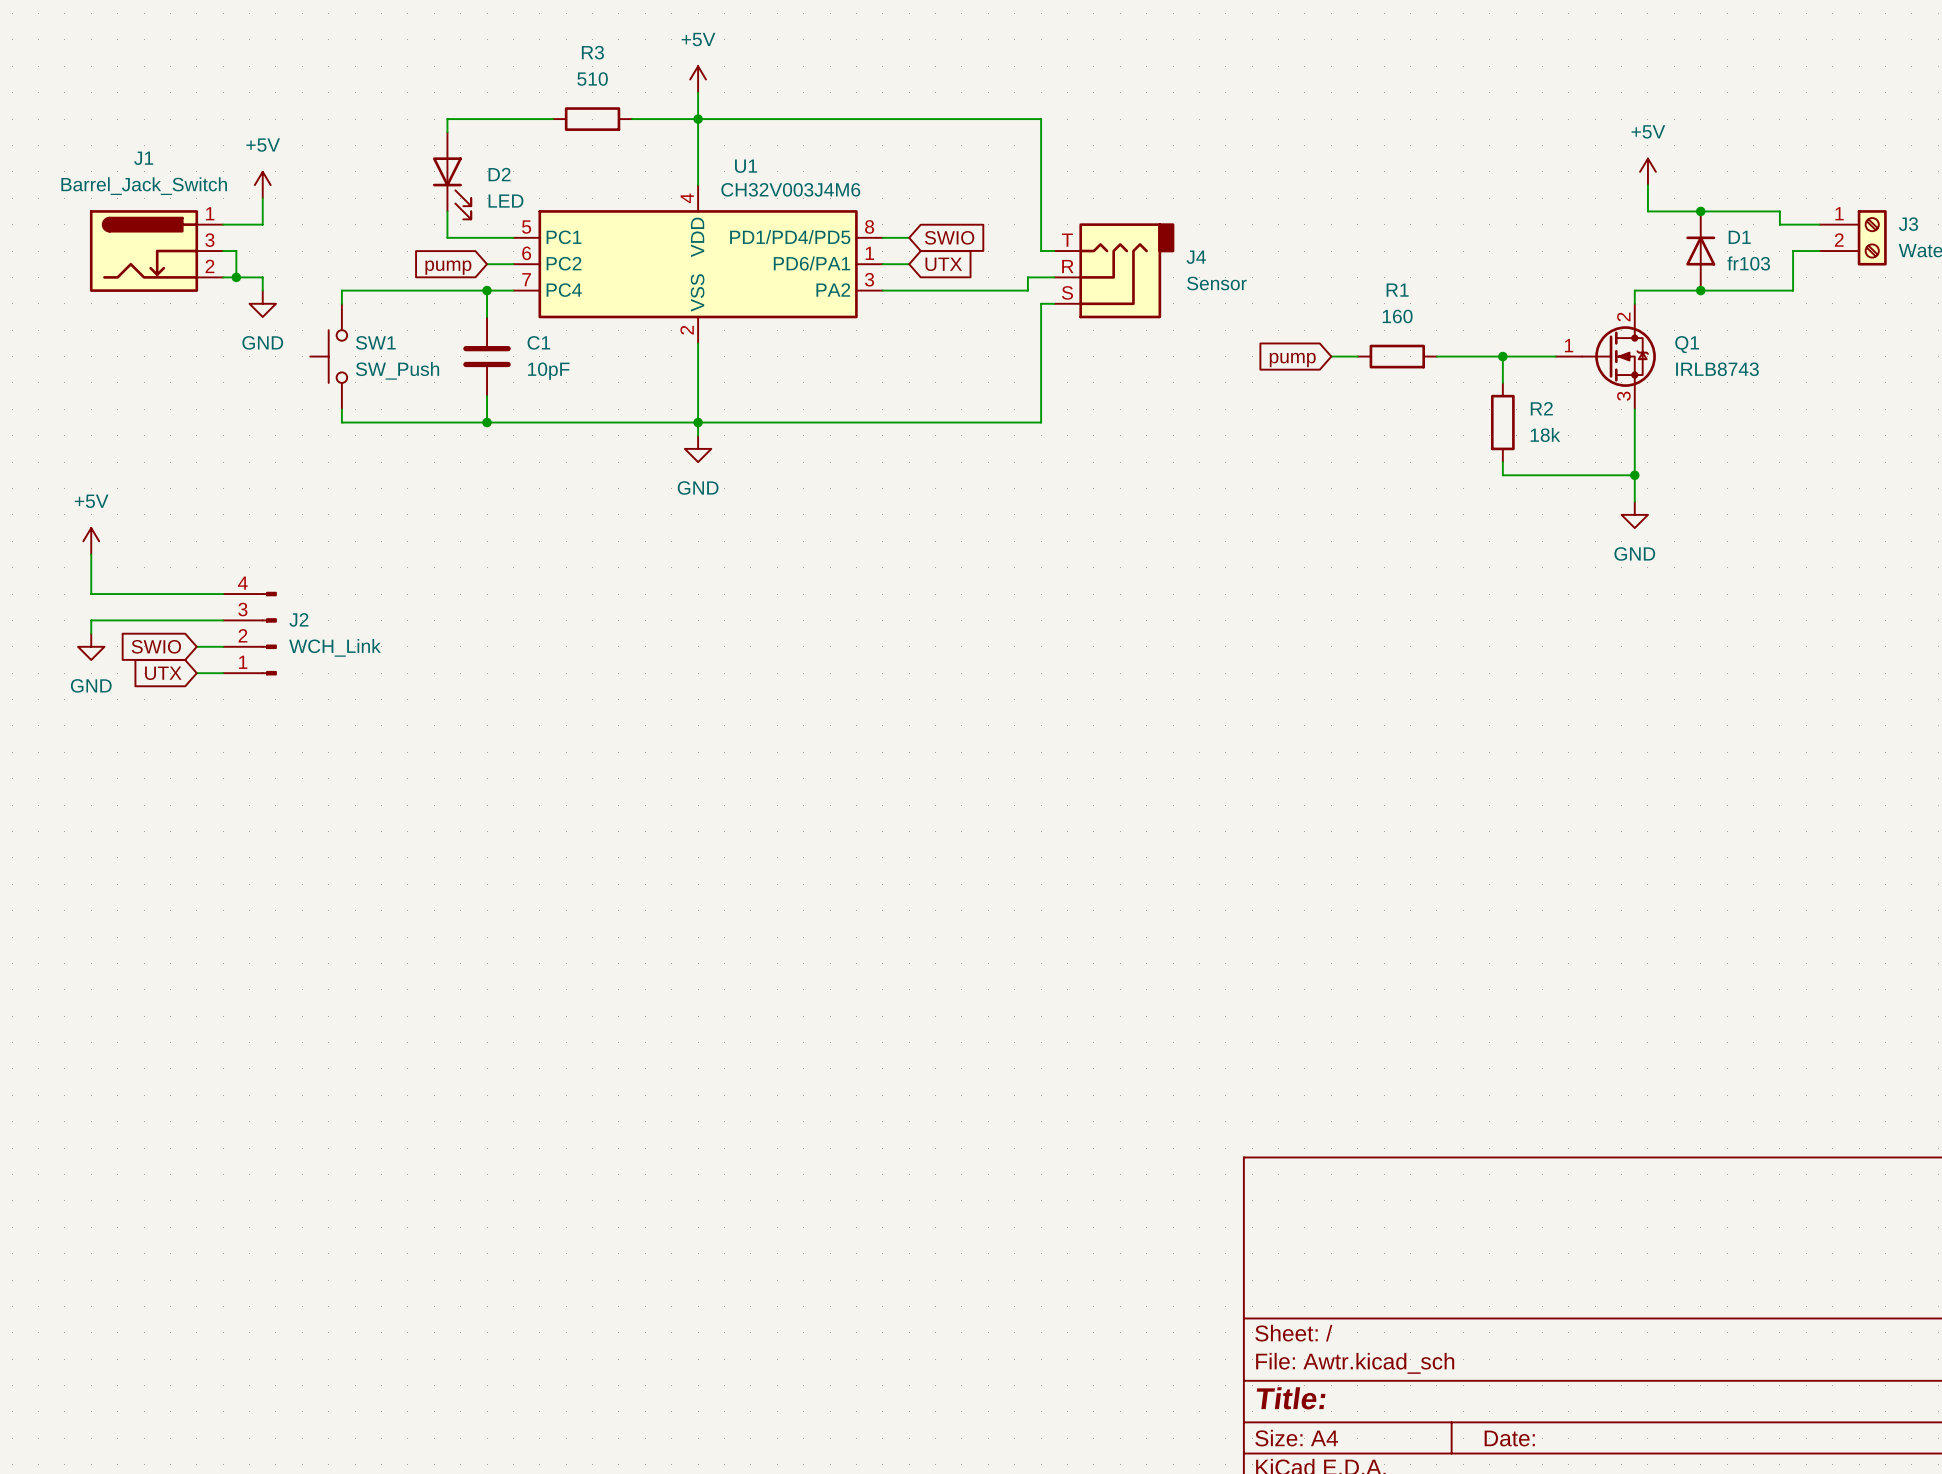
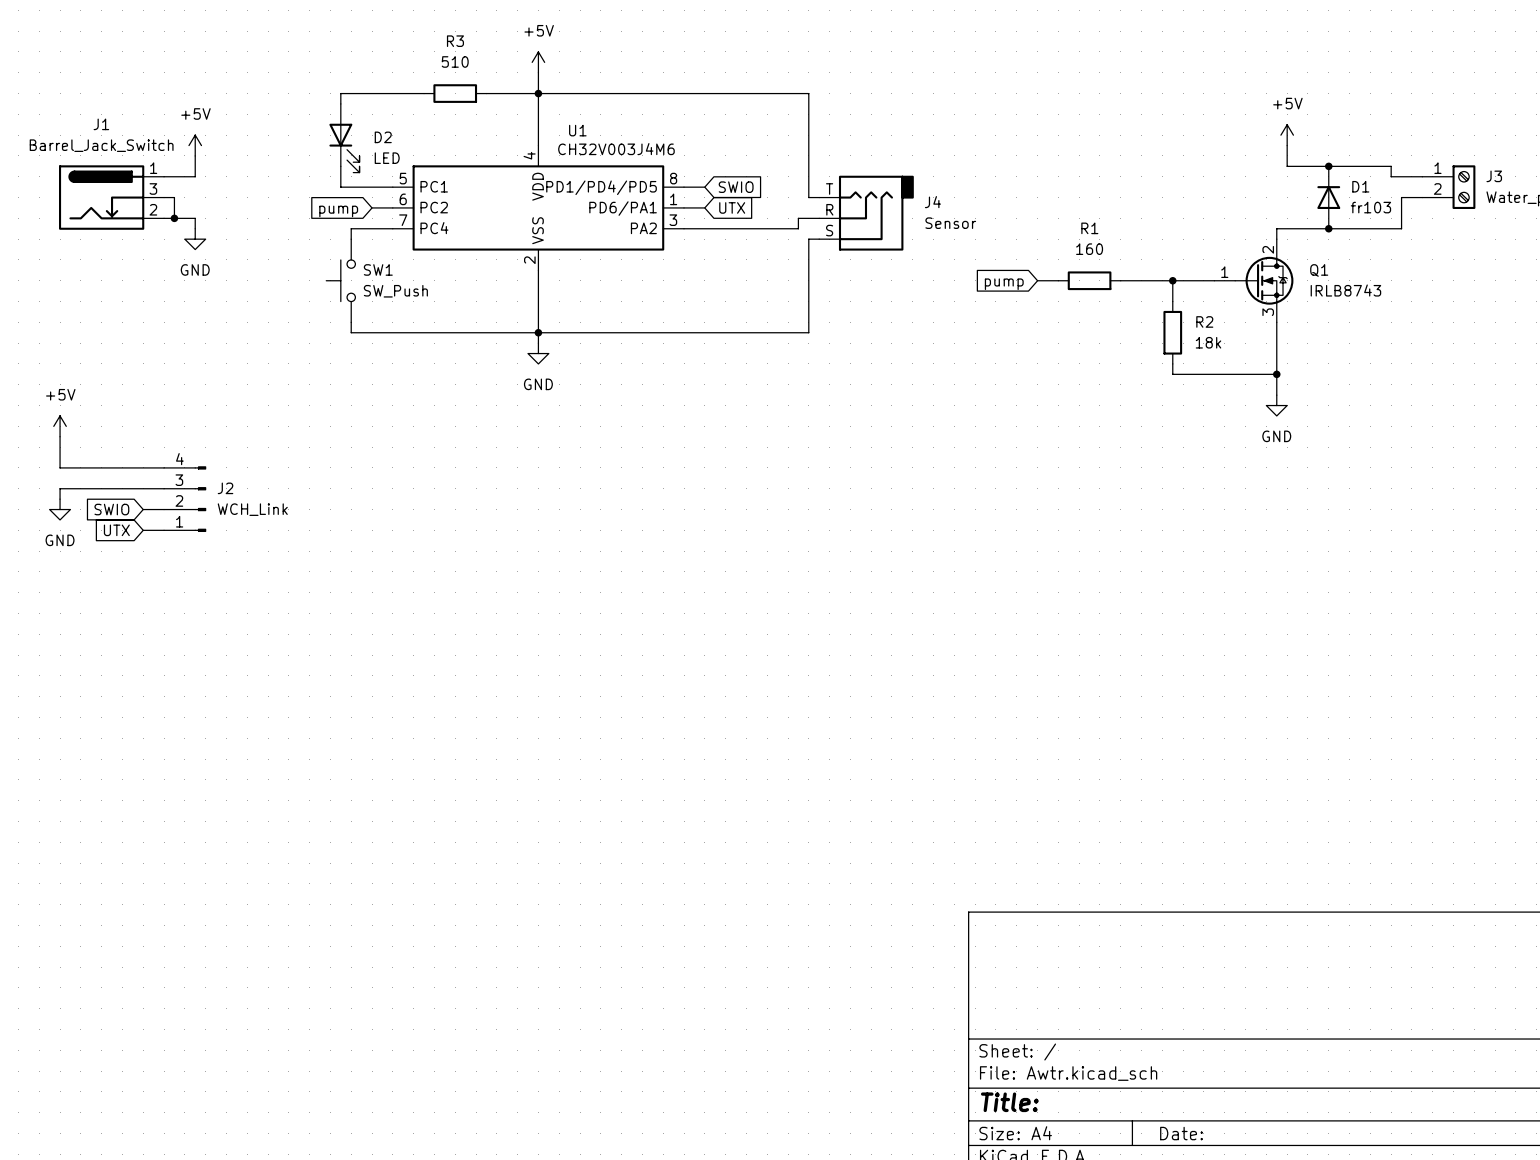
wire: (460, 290) (341, 290) (341, 303) -> (351, 228) (351, 239)
wire: (487, 290) (487, 316) -> none
junction: (487, 290) -> none
SW1 position: (328, 356) -> (340, 280)
C1: 10pF (487, 356) -> none
wire: (487, 396) (487, 422) -> none
wire: (341, 409) (341, 422) (460, 422) -> (351, 322) (351, 332)
junction: (487, 422) -> none

